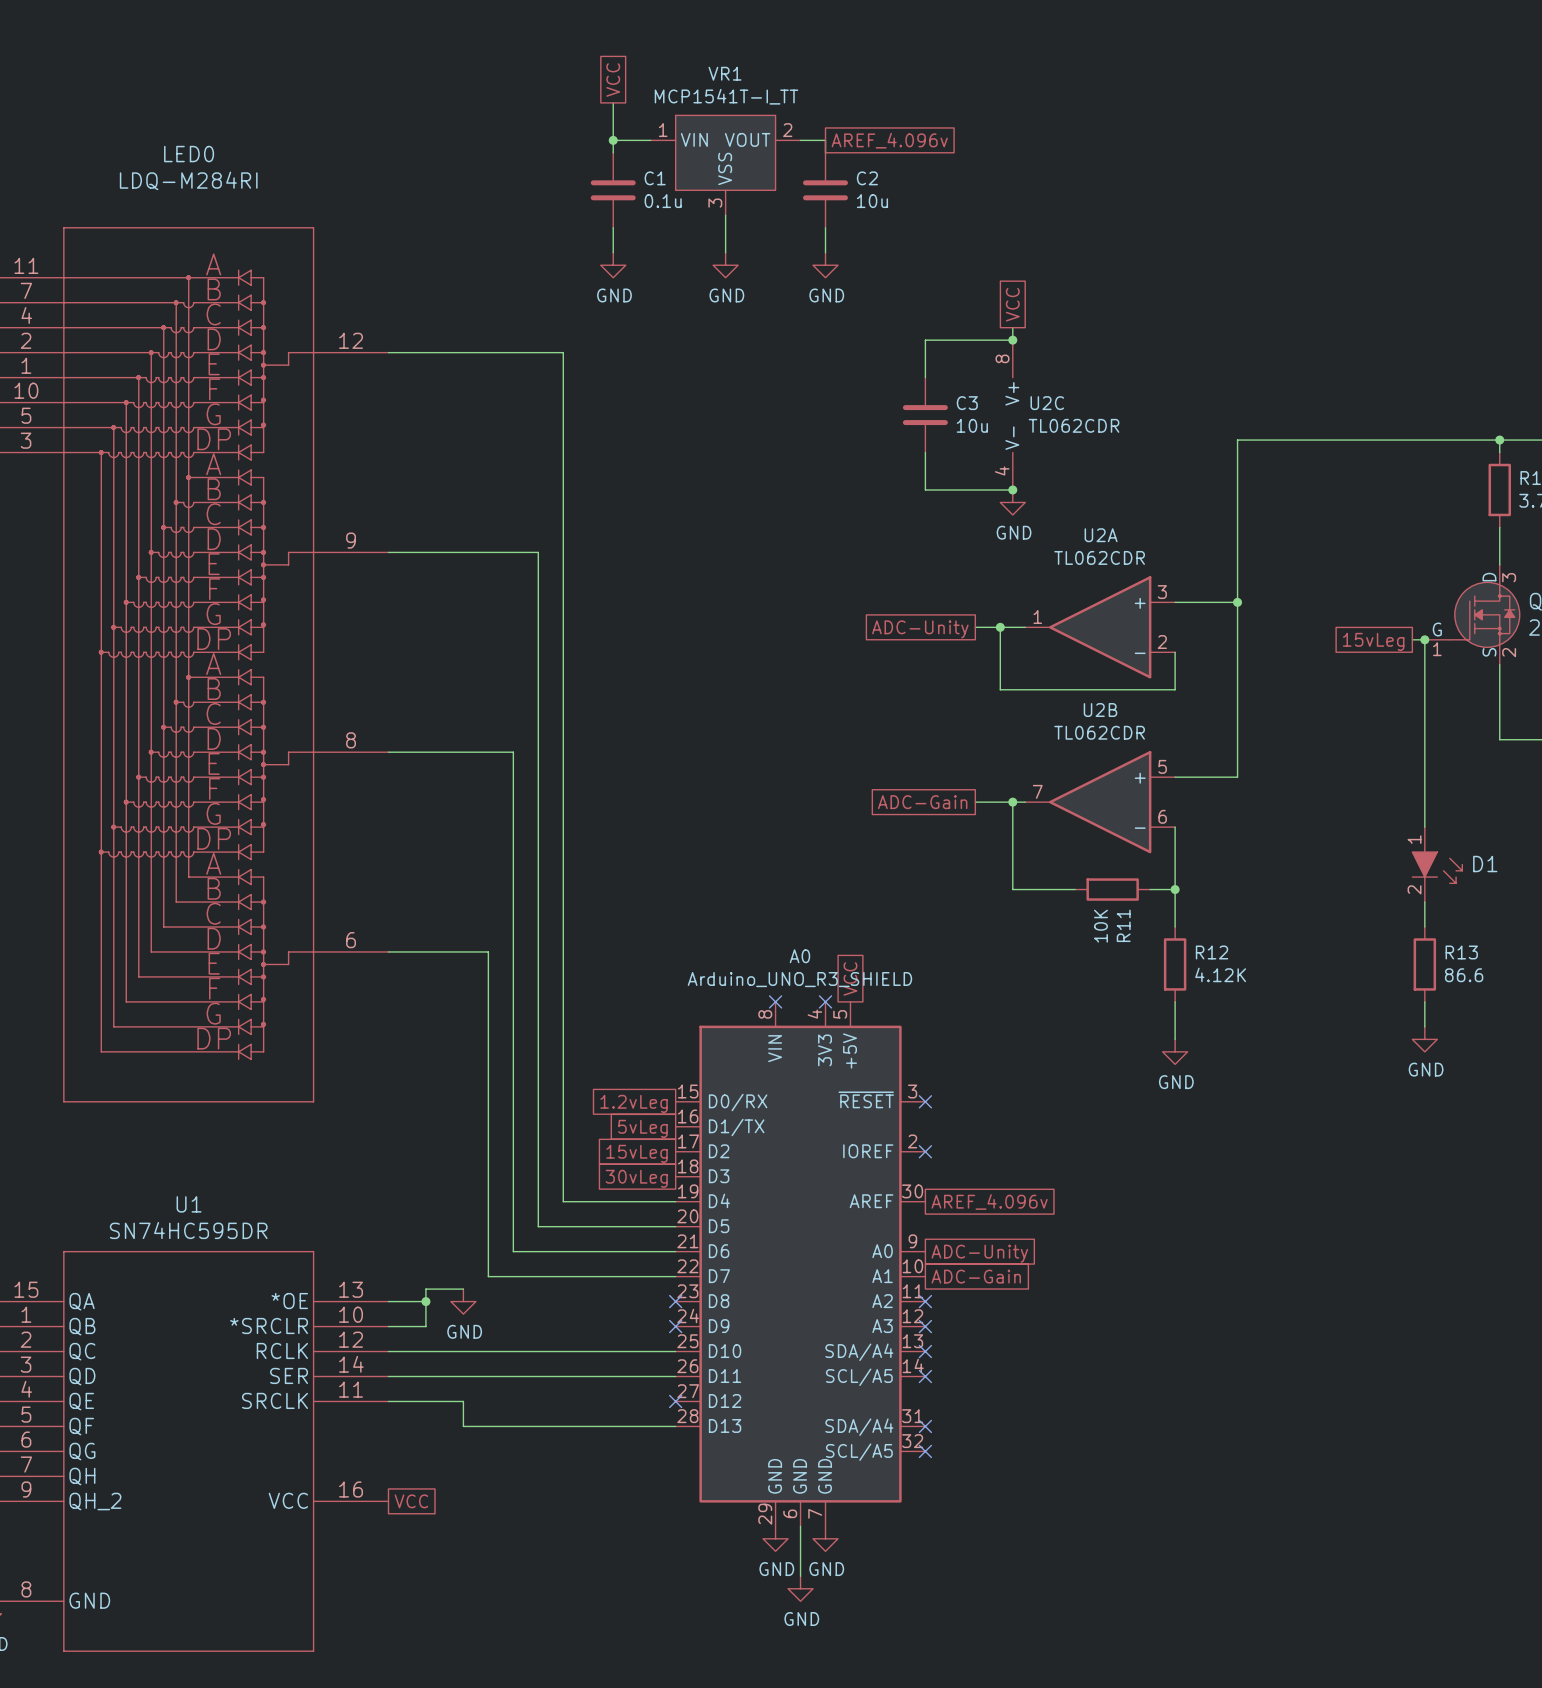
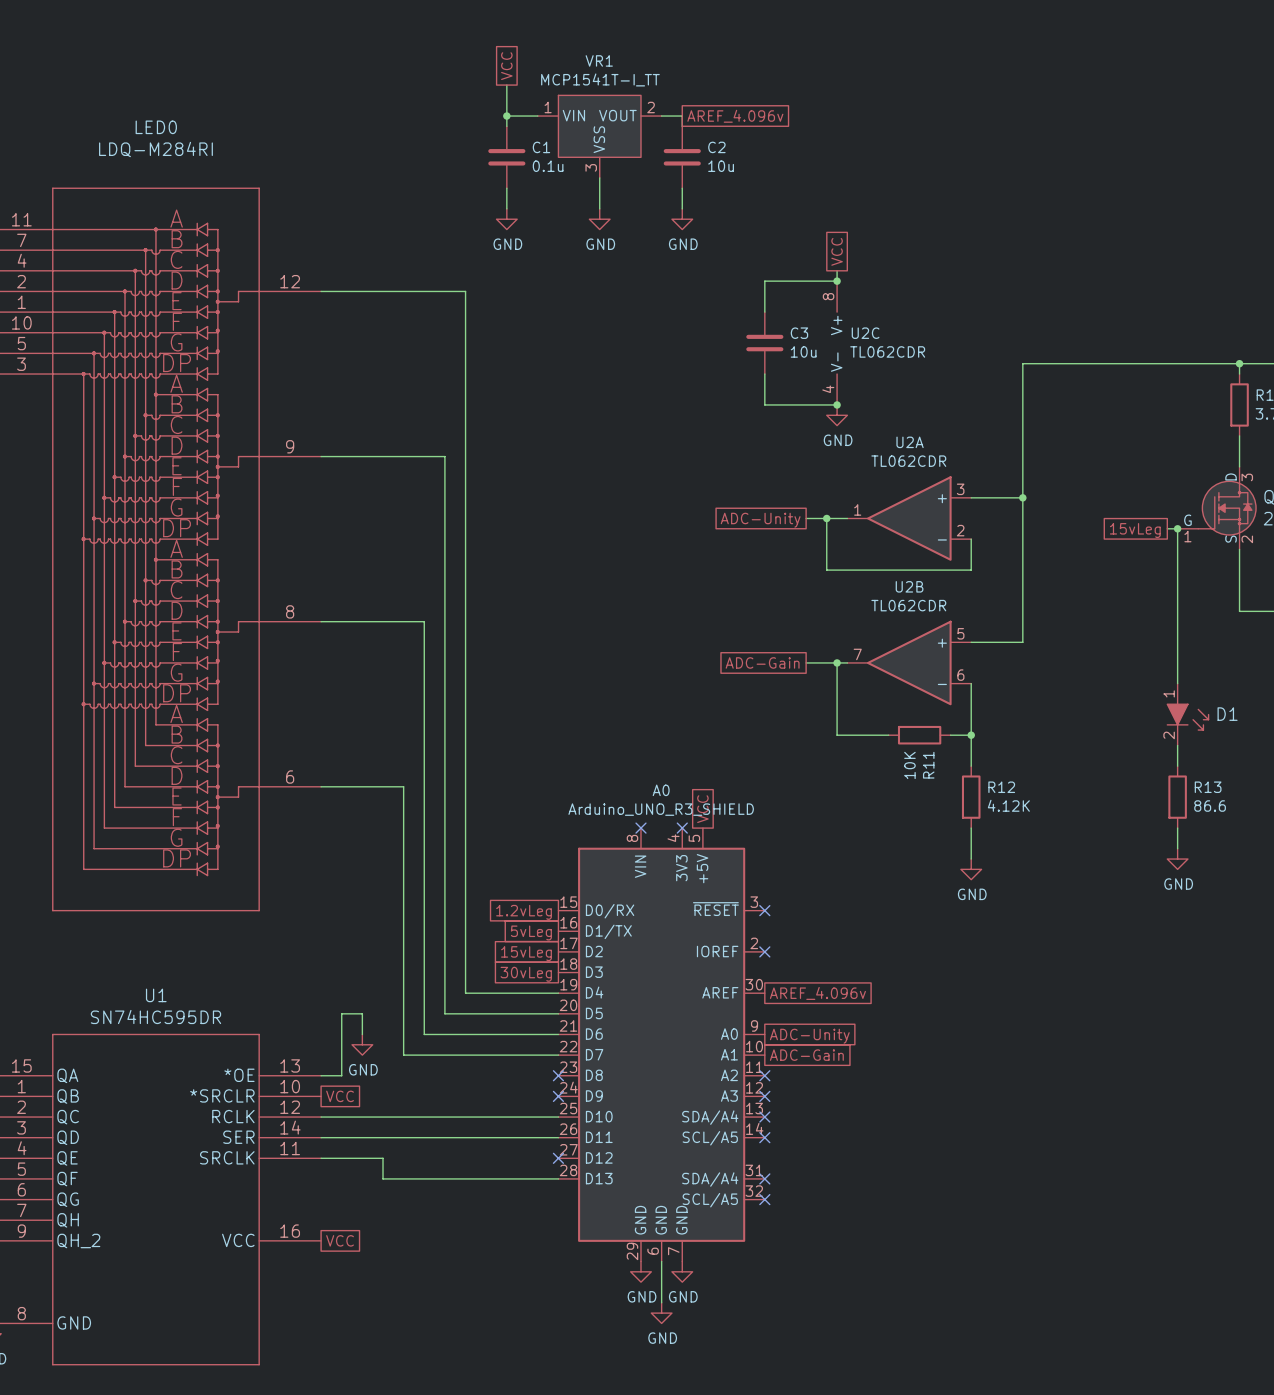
wire: (463, 1289) (425, 1289) (425, 1326) (388, 1326) -> none
wire: (413, 1301) (425, 1301) -> (341, 1075) (341, 1013) (362, 1013) (362, 1034)
junction: (425, 1301) -> none
power symbol position: GND (463, 1301) -> GND (362, 1044)
global label: none -> VCC (340, 1096)

